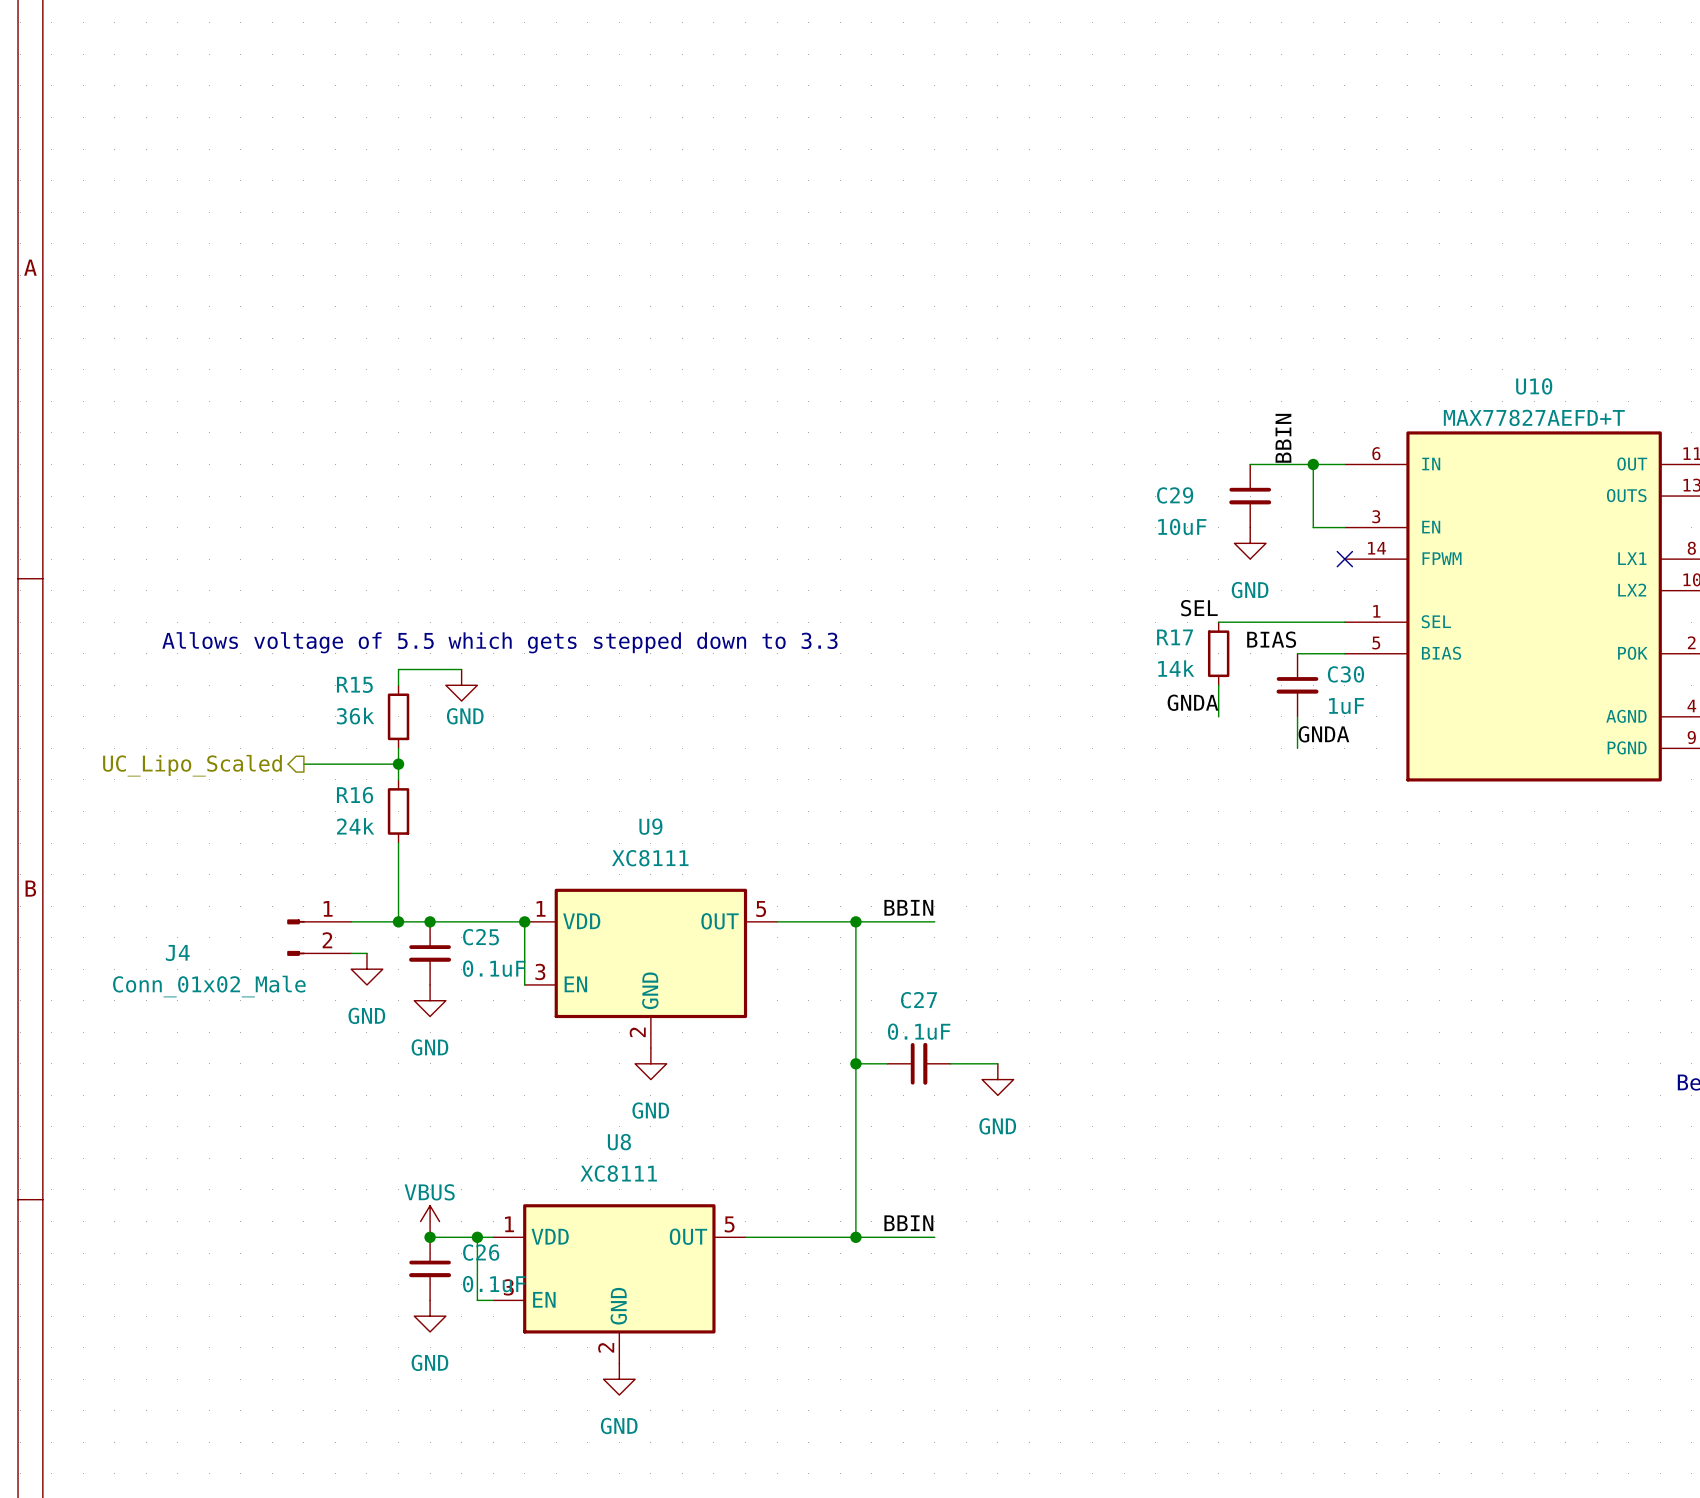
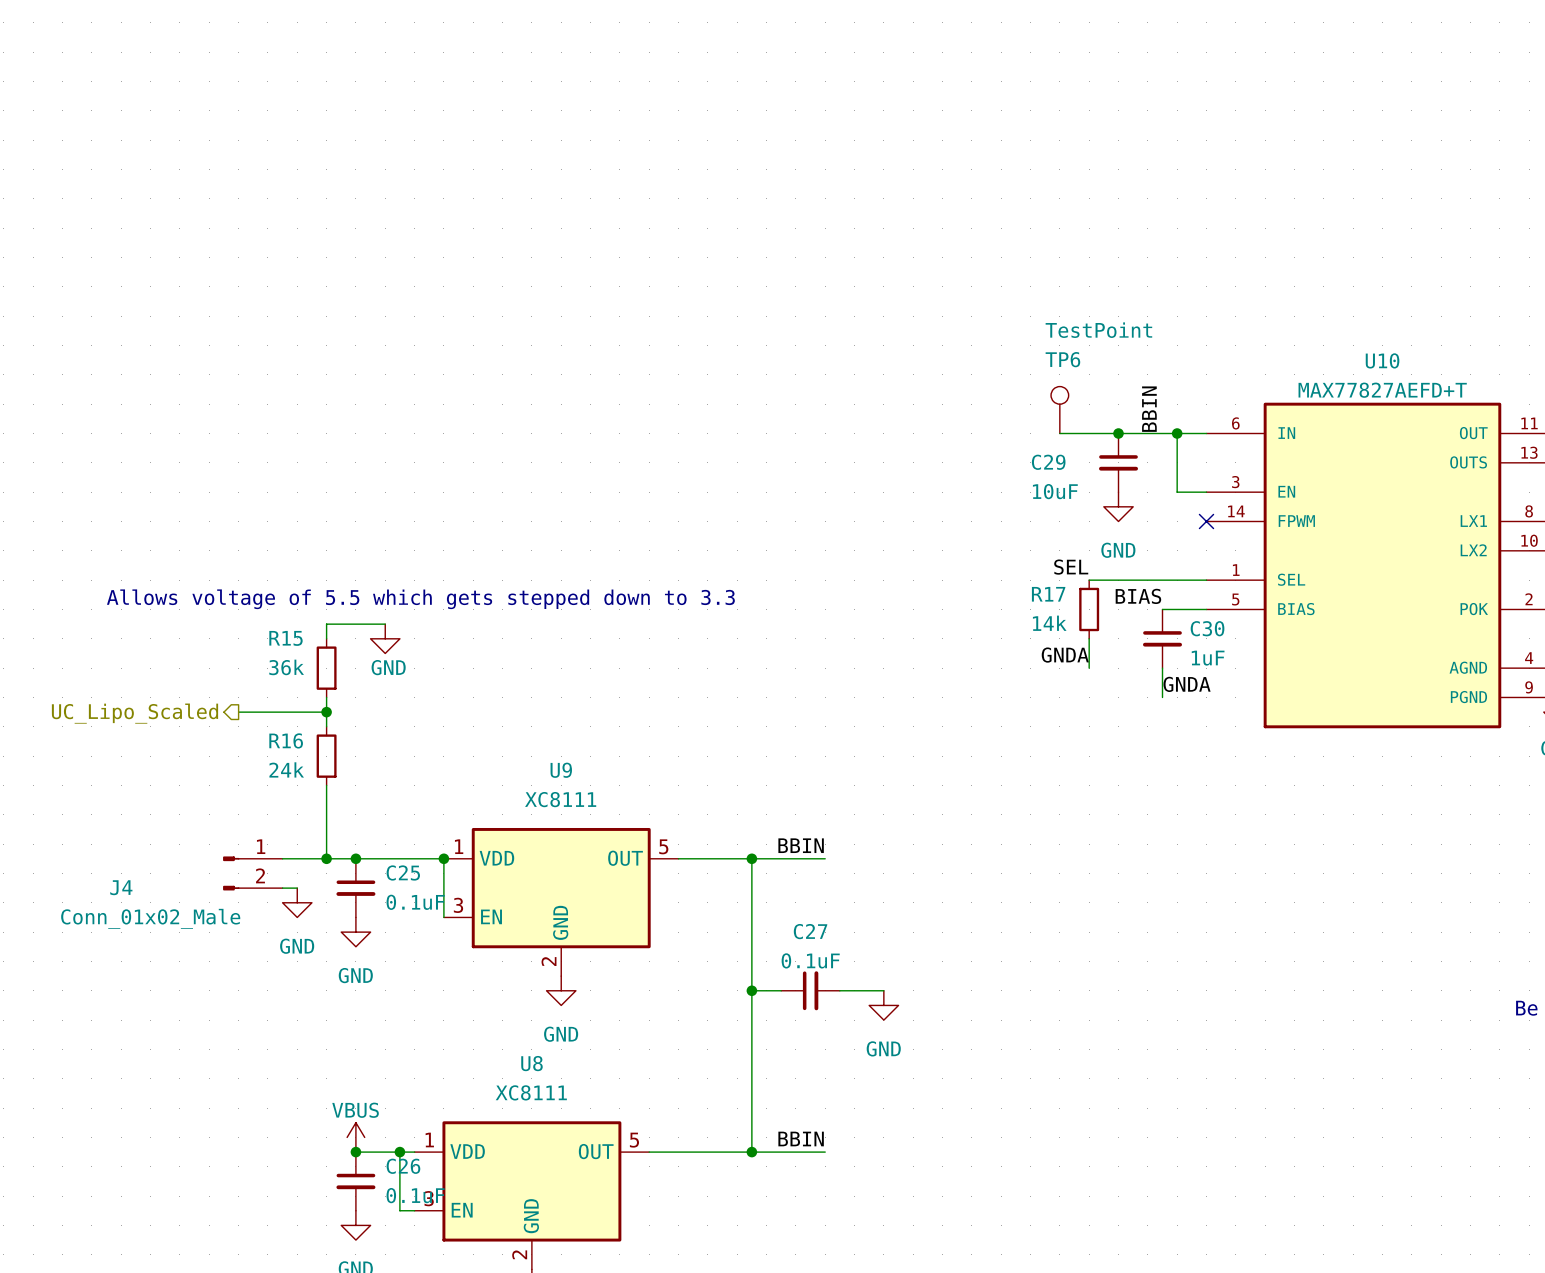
TP6: none -> TestPoint (1059, 410)
wire: none -> (1059, 433) (1118, 433)
junction: none -> (1118, 433)

